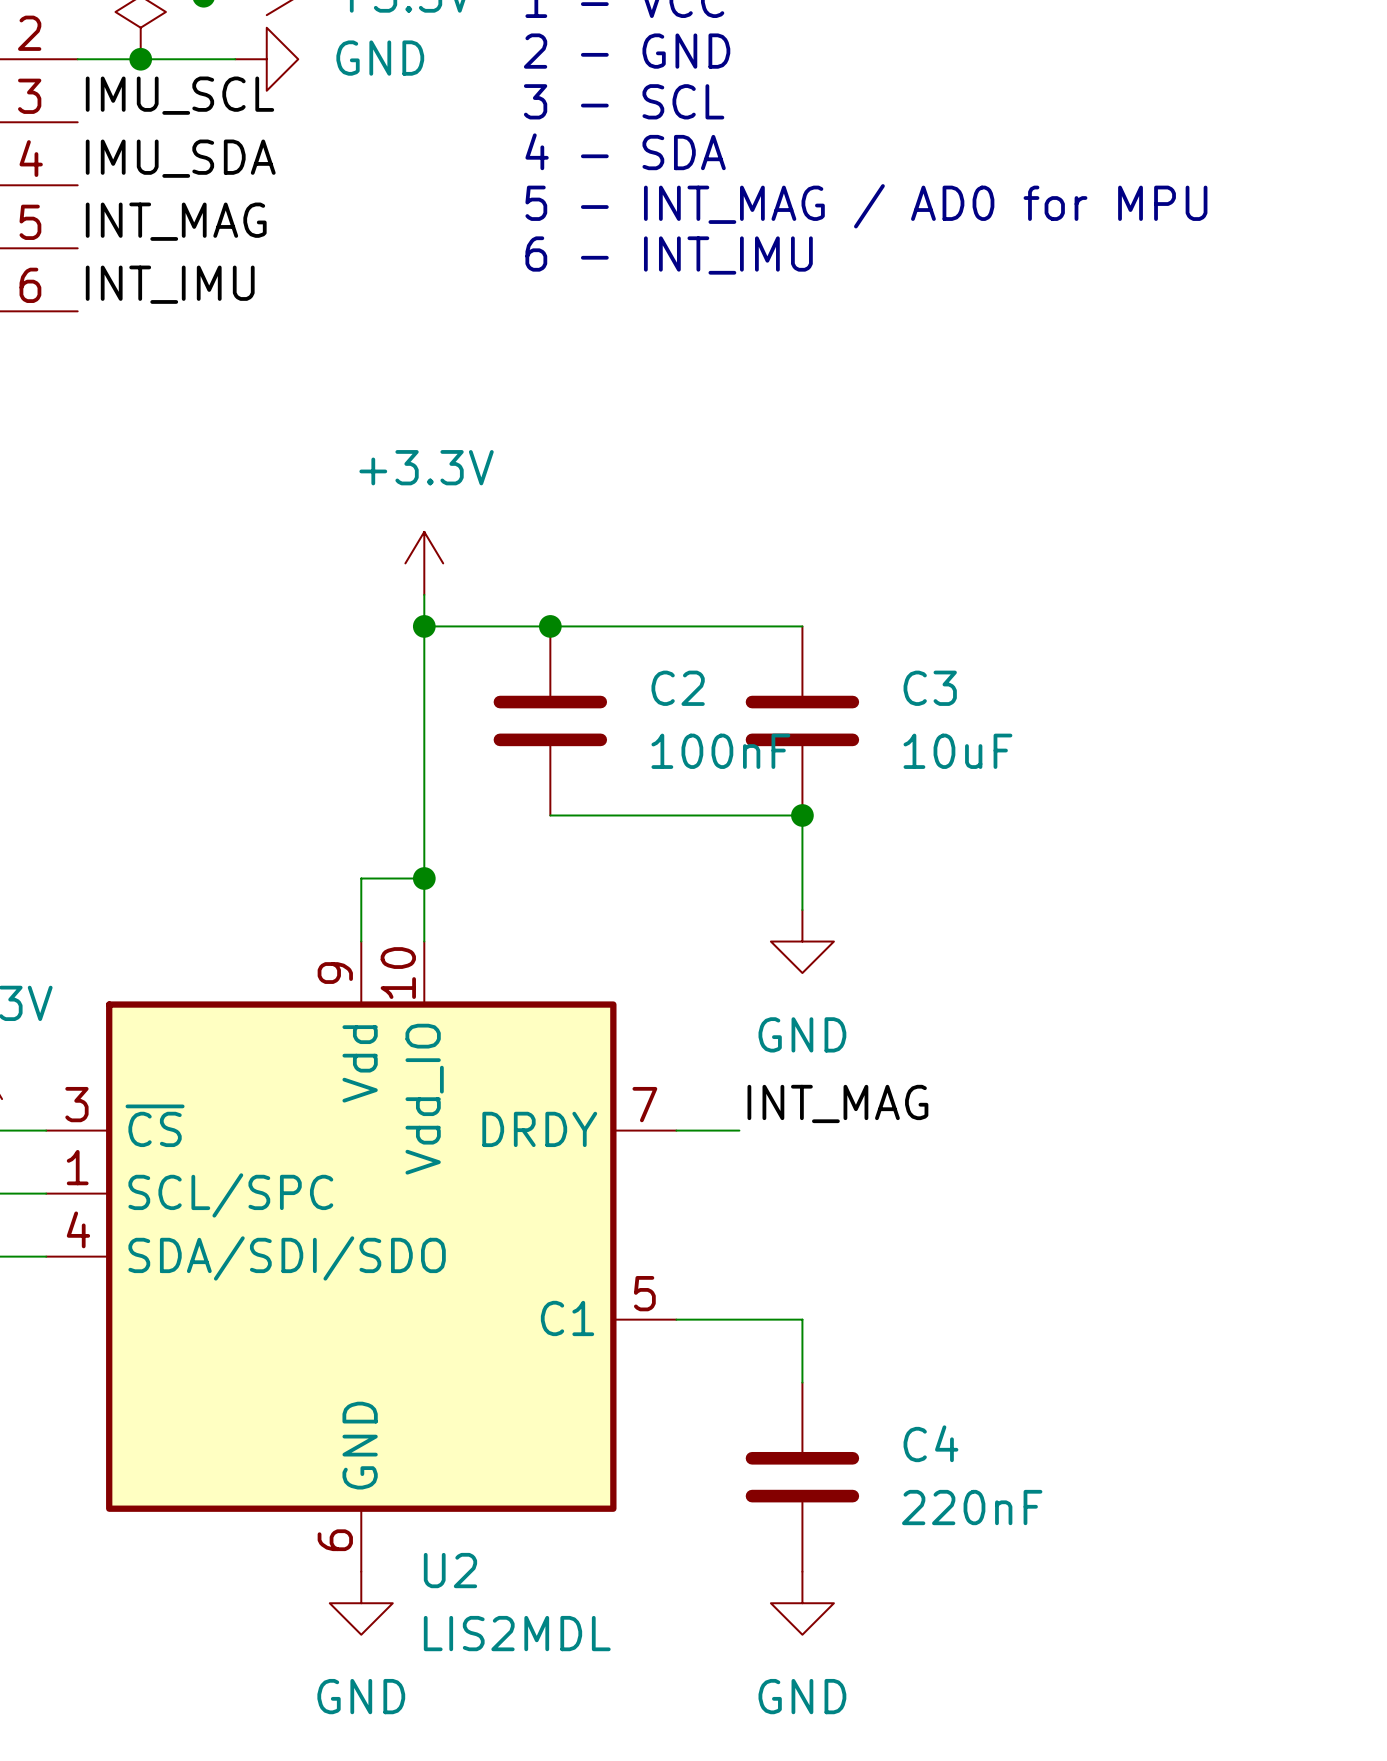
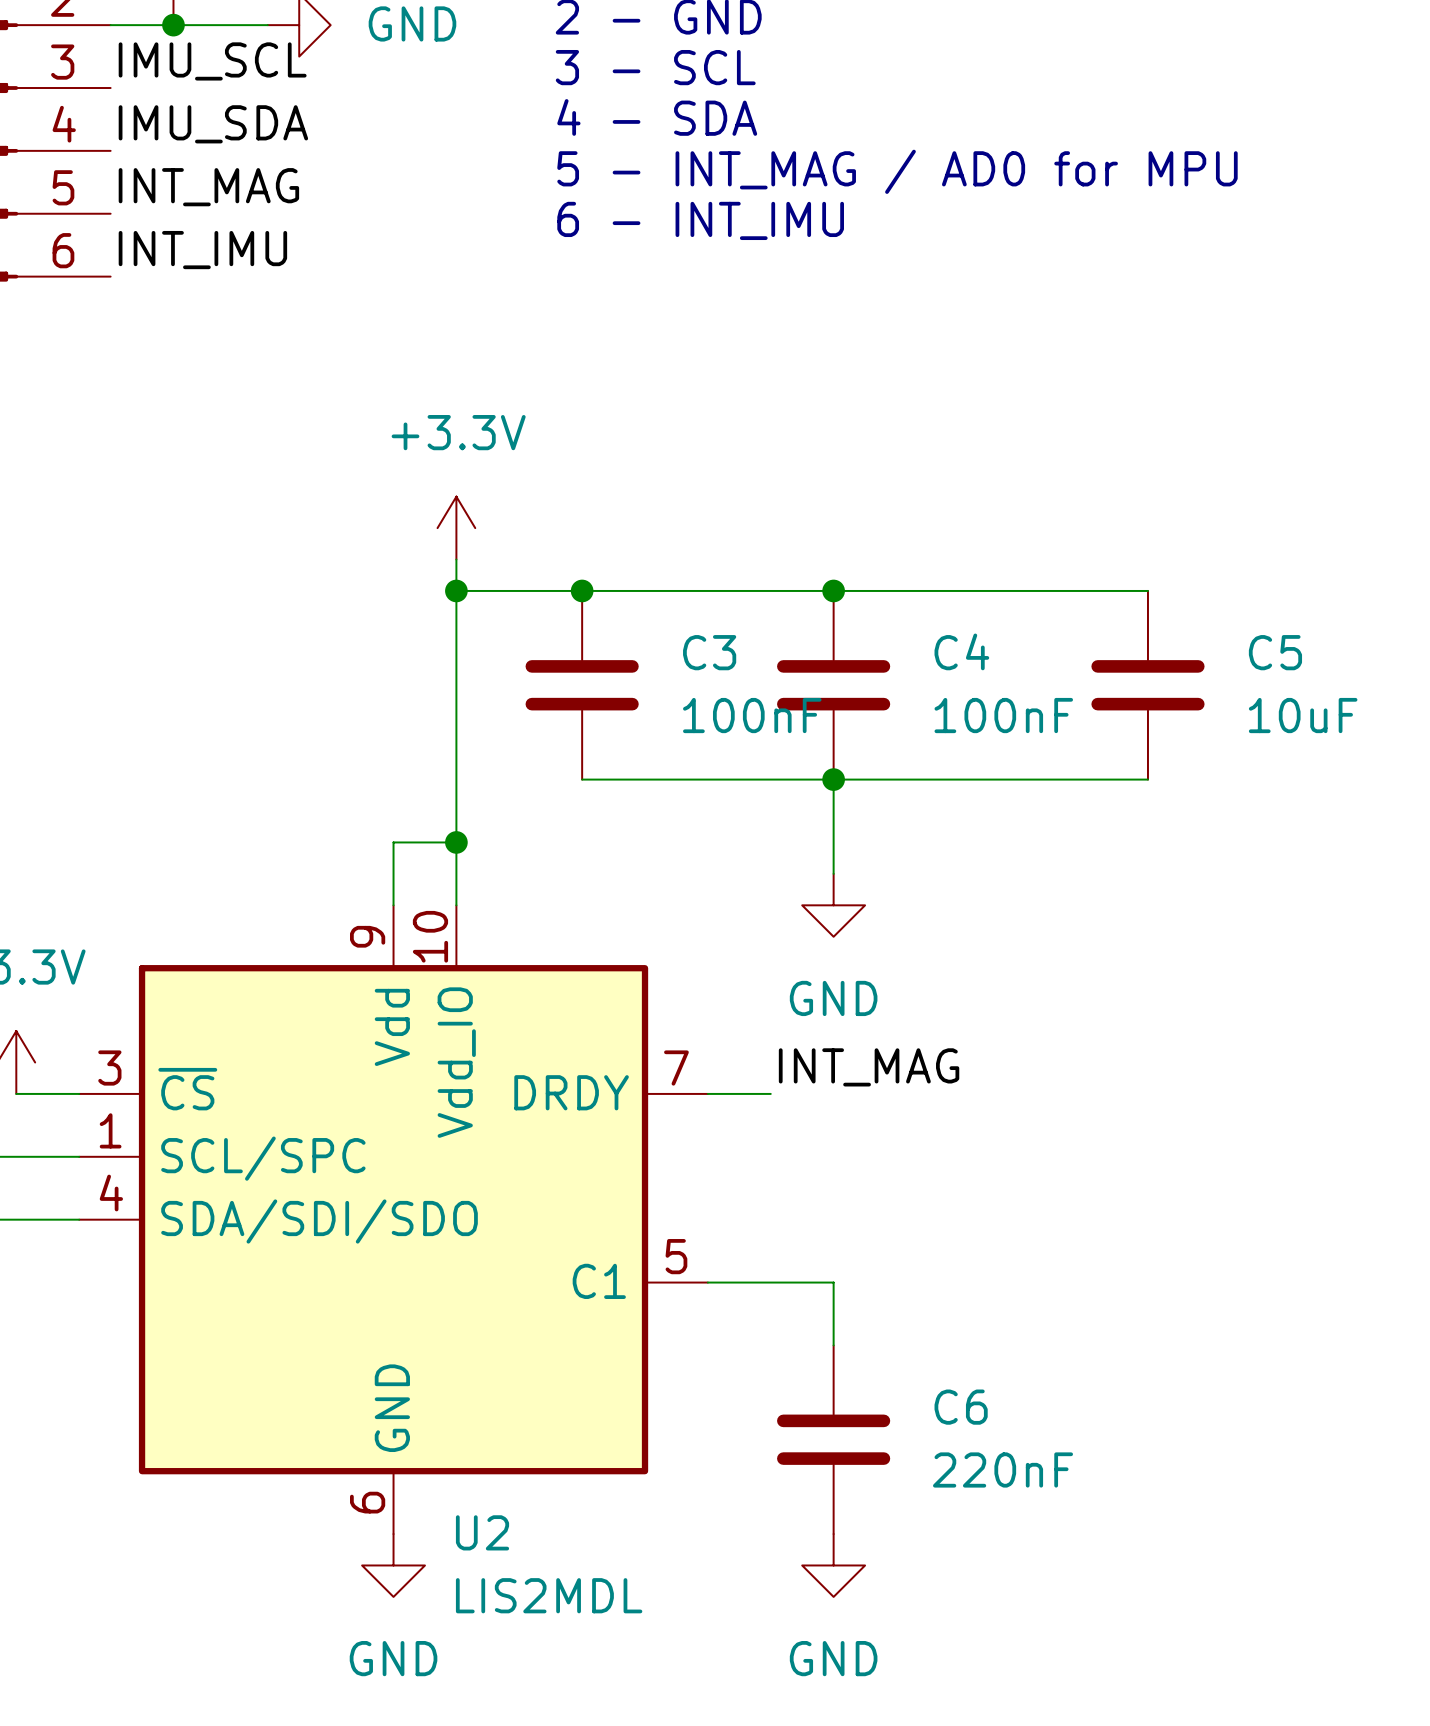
wire: none -> (833, 590) (1147, 590)
junction: none -> (833, 590)
C2 name: C2 (678, 688) -> C3 (709, 652)
C3 name: C3 (930, 688) -> C4 (961, 651)
C5: none -> 10uF (1147, 685)
C3 value: 10uF (957, 751) -> 100nF (1003, 715)
wire: none -> (833, 779) (1147, 779)
C4 name: C4 (930, 1443) -> C6 (961, 1407)

